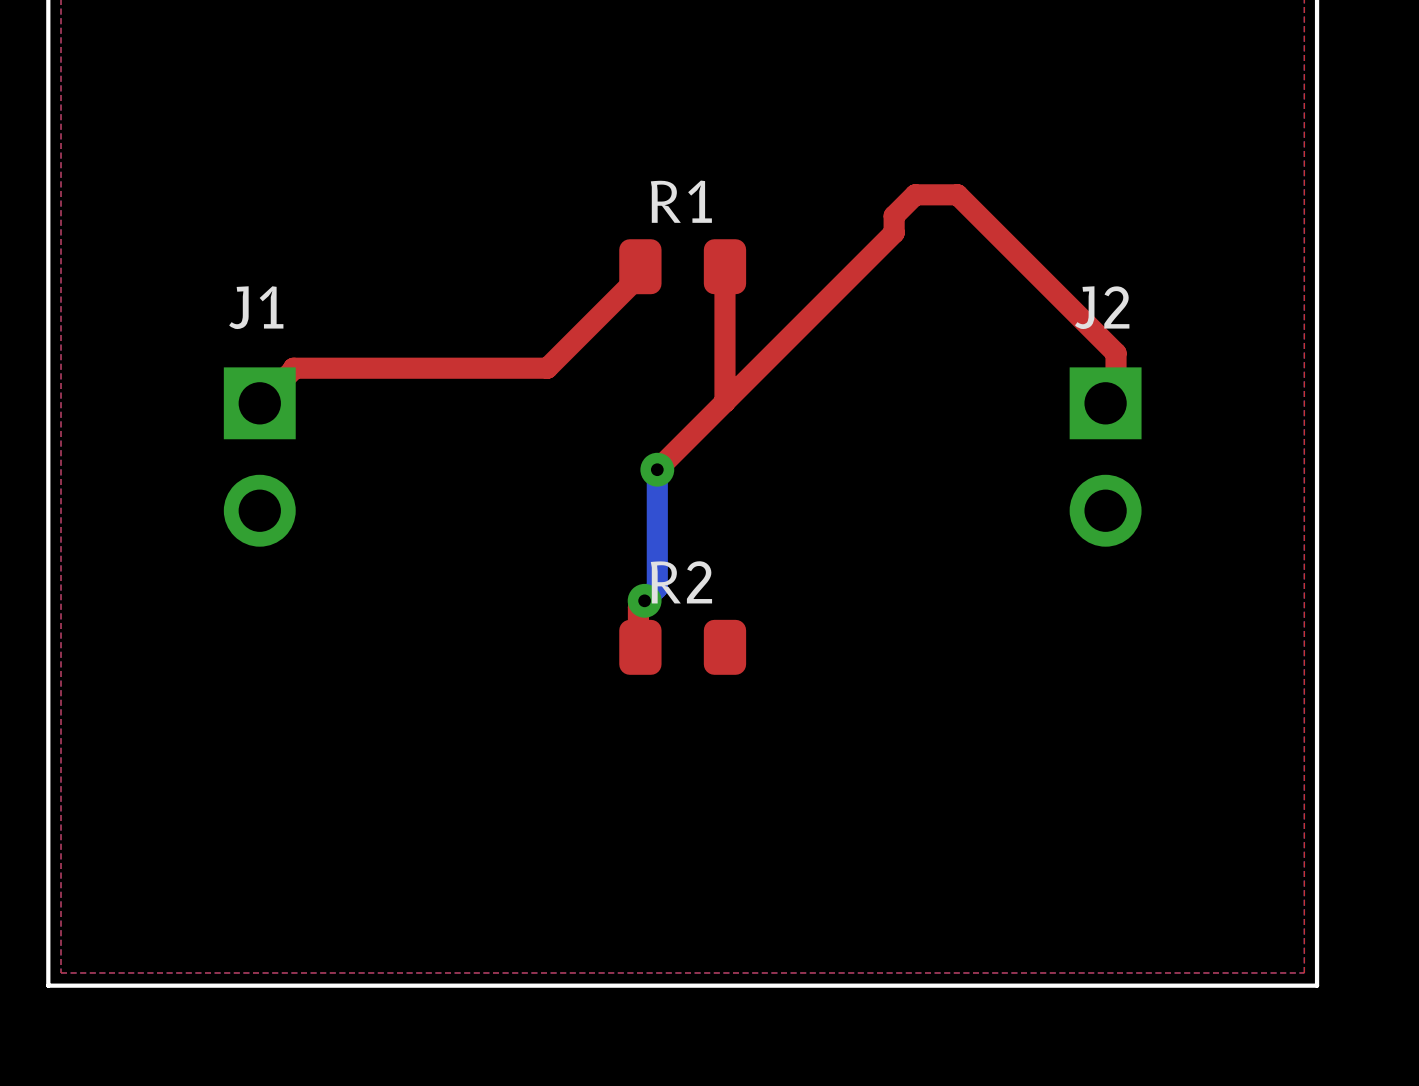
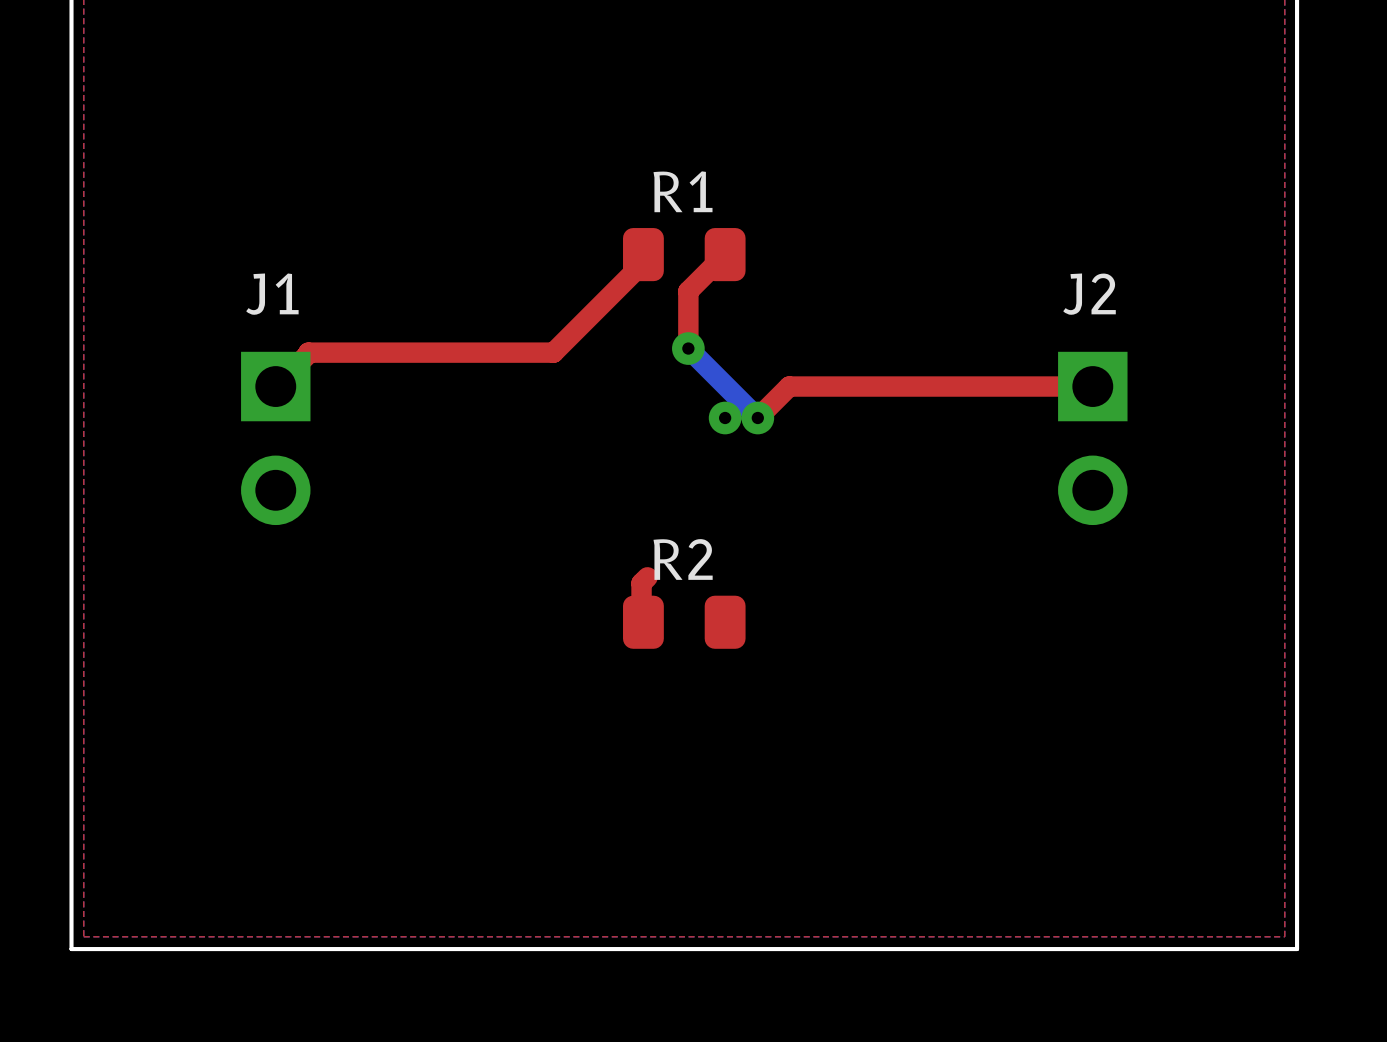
top track: (724, 266) (724, 402) -> (725, 254) (688, 291) (688, 348)
bottom track: none -> (688, 348) (757, 417)
via: none -> (688, 348)
top track: (1105, 403) (1105, 393) (1116, 383) (1116, 353) (957, 194) (915, 194) (894, 215) (894, 232) (657, 469) -> (1092, 386) (789, 386) (757, 417)
via: none -> (725, 417)
via: none -> (757, 417)
bottom track: (657, 469) (657, 588) (644, 600) -> none
via: (657, 469) -> none
via: (644, 600) -> none

